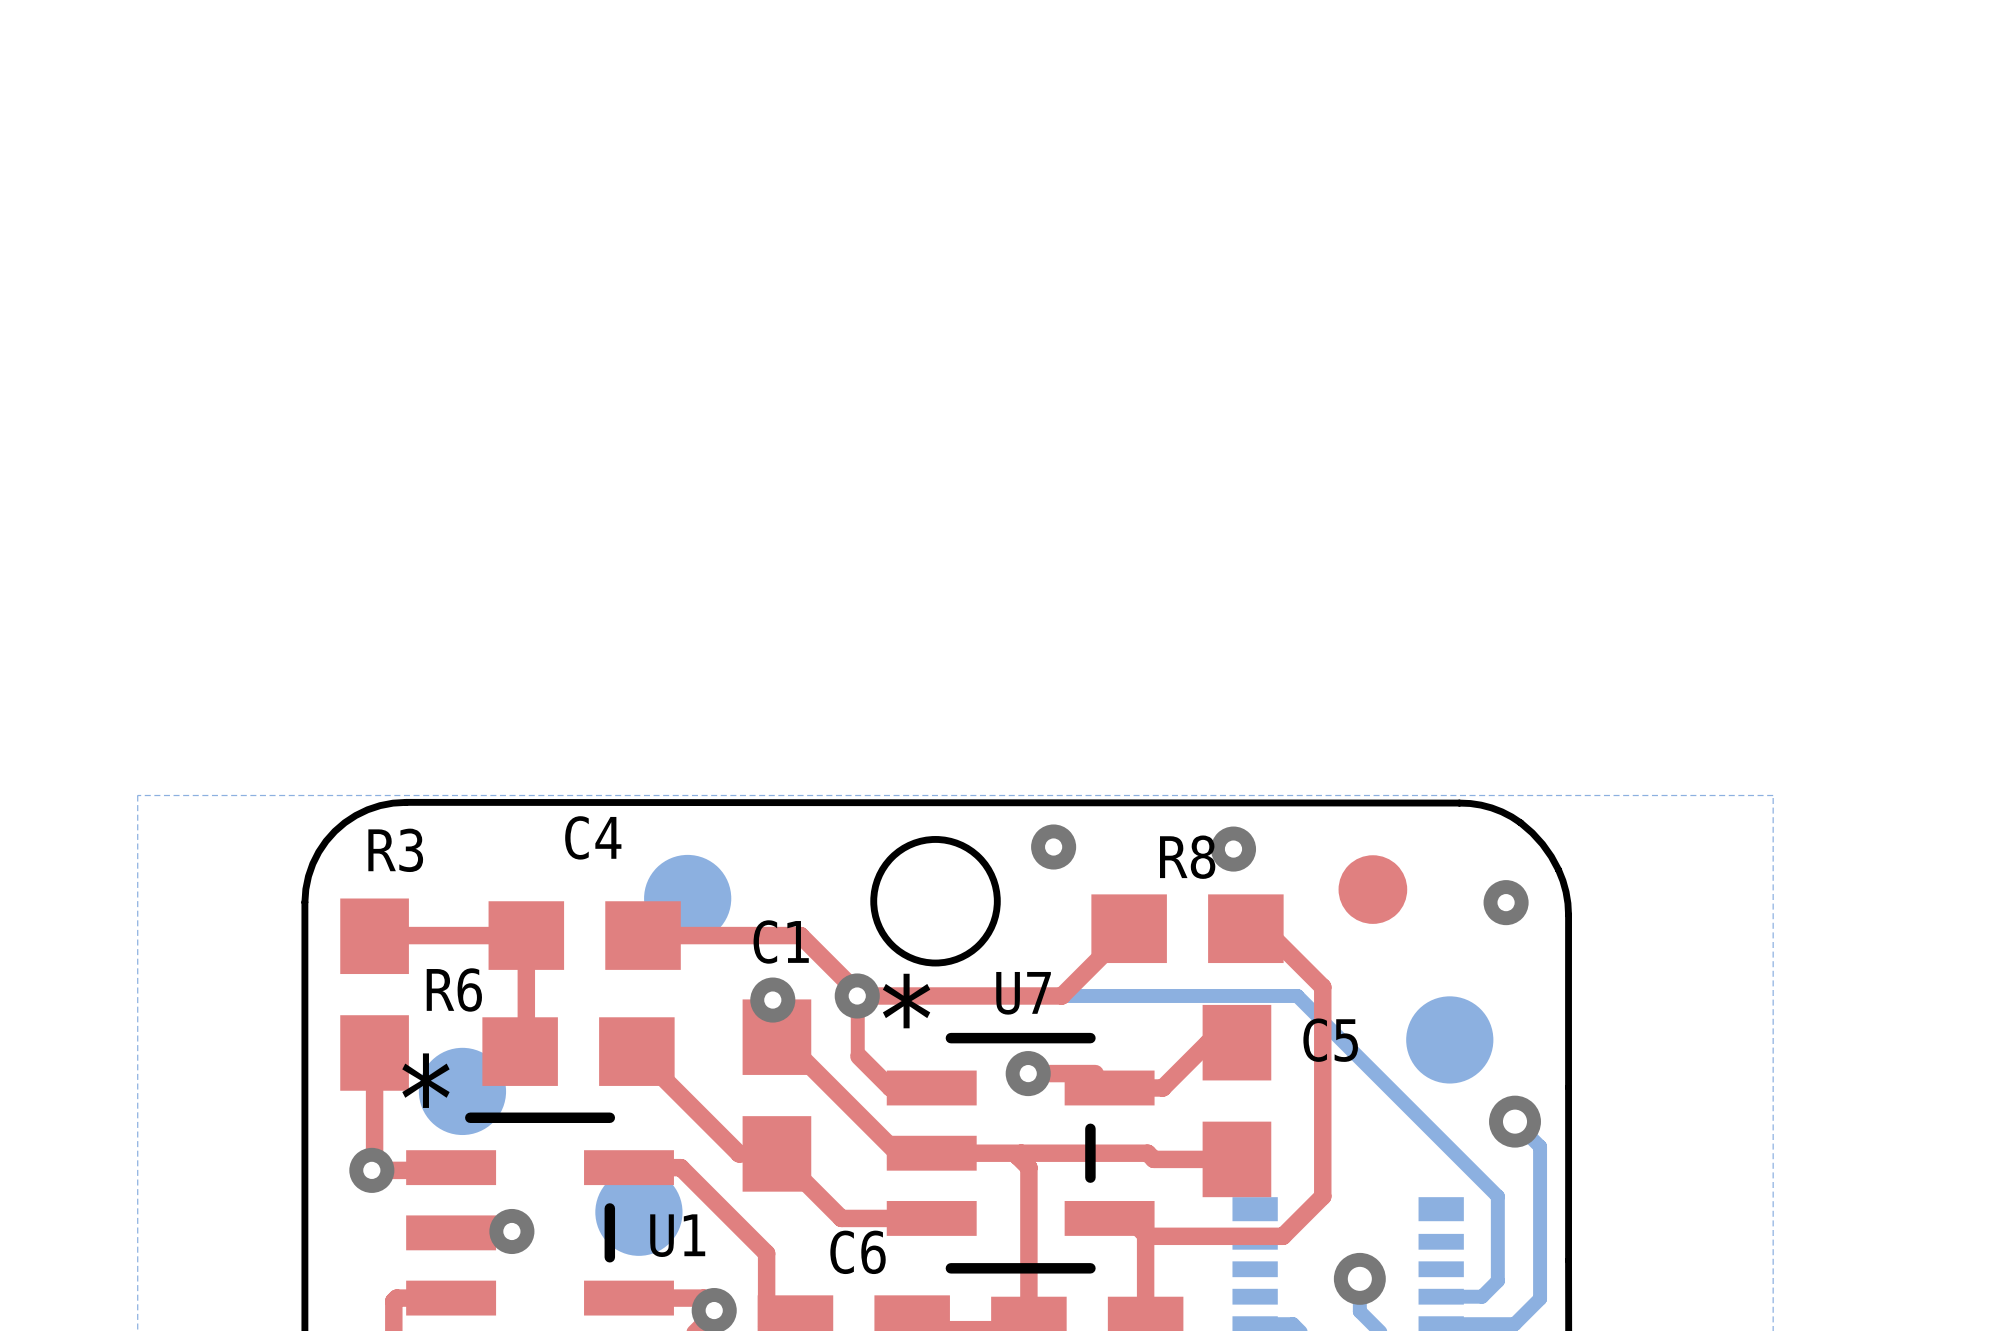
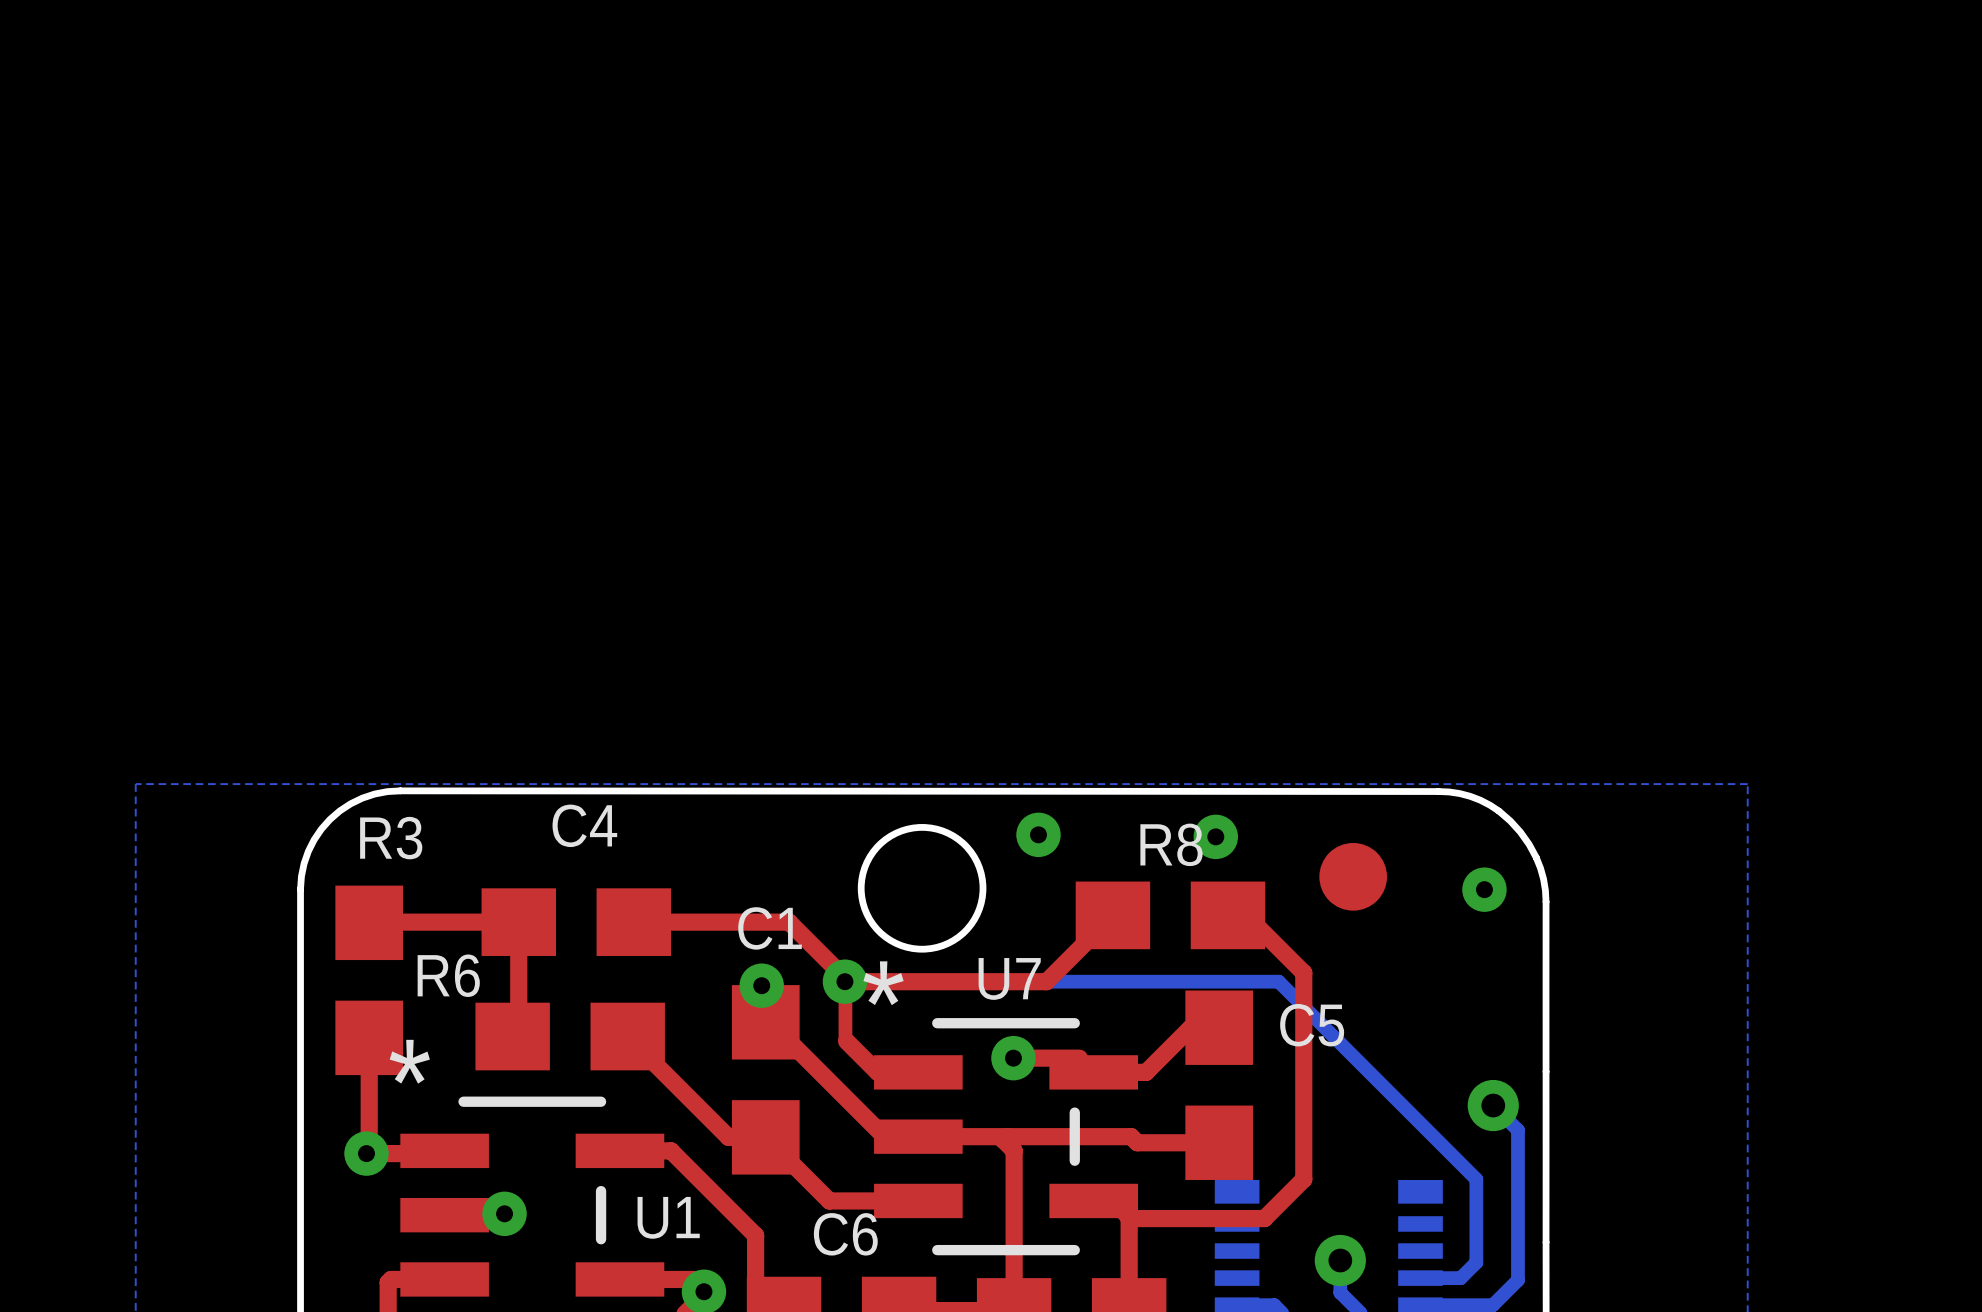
part: (687, 898) -> none
part: (1449, 1039) -> none
part: (462, 1091) -> none
part: (638, 1212) -> none

